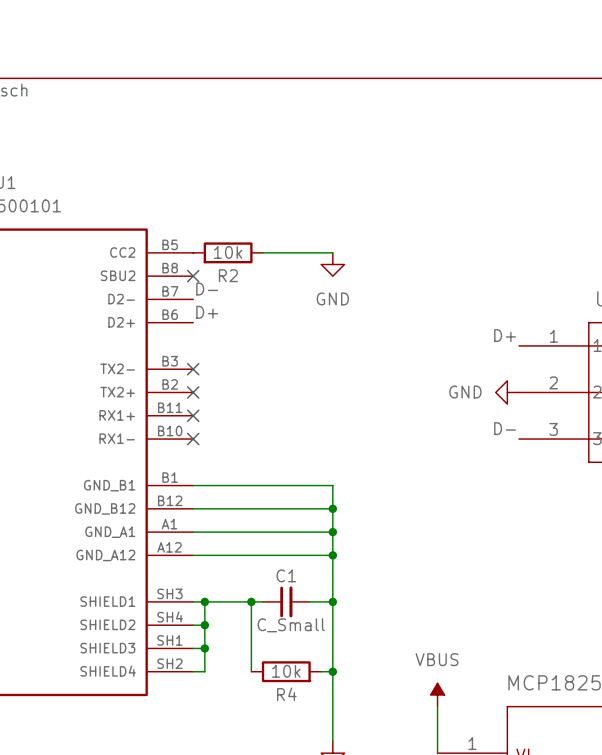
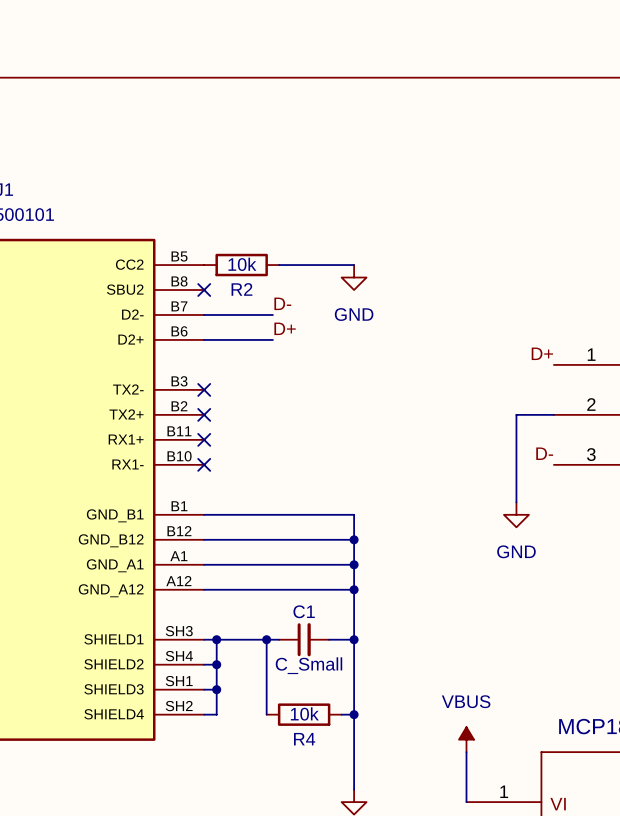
label position: D- (207, 289) -> D- (282, 303)
wire: none -> (204, 314) (272, 314)
label position: D+ (207, 312) -> D+ (285, 328)
wire: none -> (204, 339) (272, 339)
power symbol rotation: 0° (507, 392) -> 90° counterclockwise (516, 514)
power symbol position: GND (507, 392) -> GND (516, 514)
wire: none -> (553, 414) (516, 414) (516, 502)

